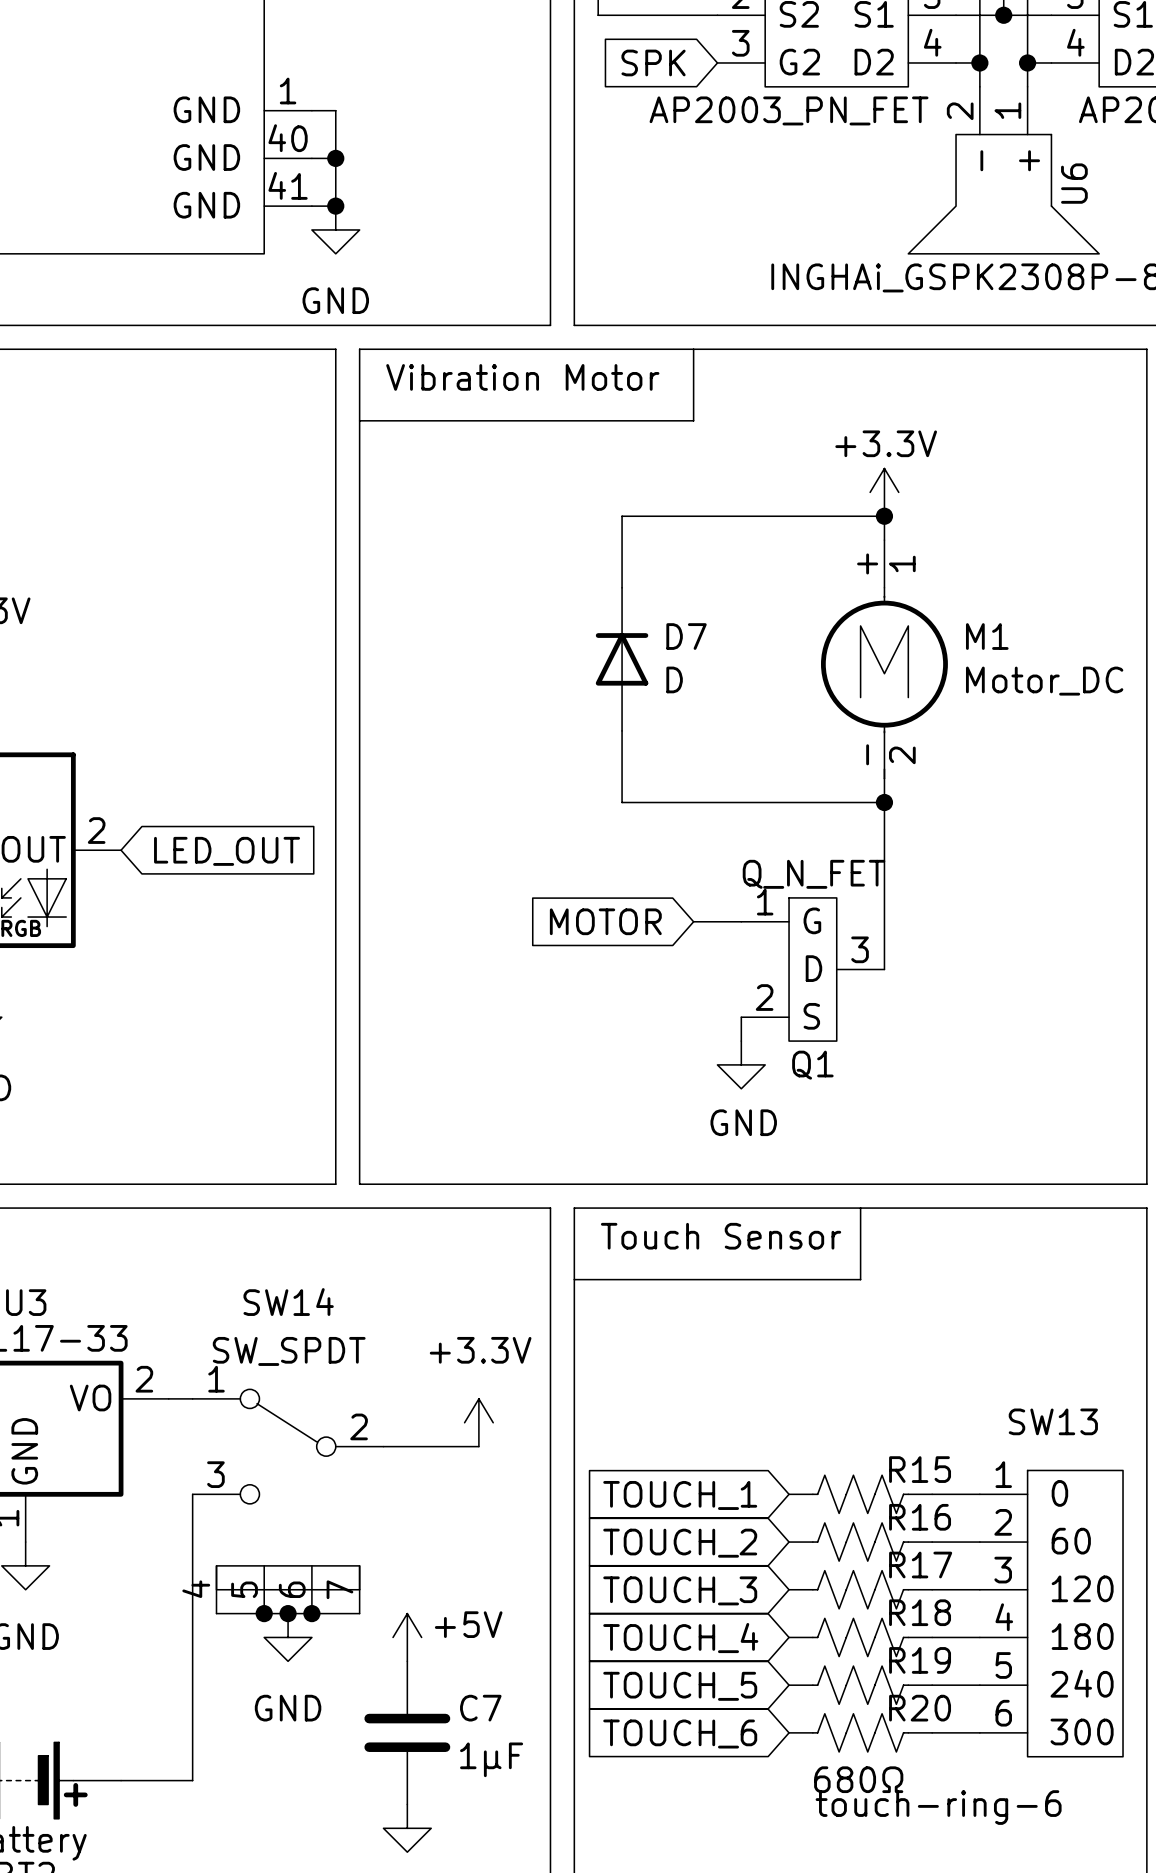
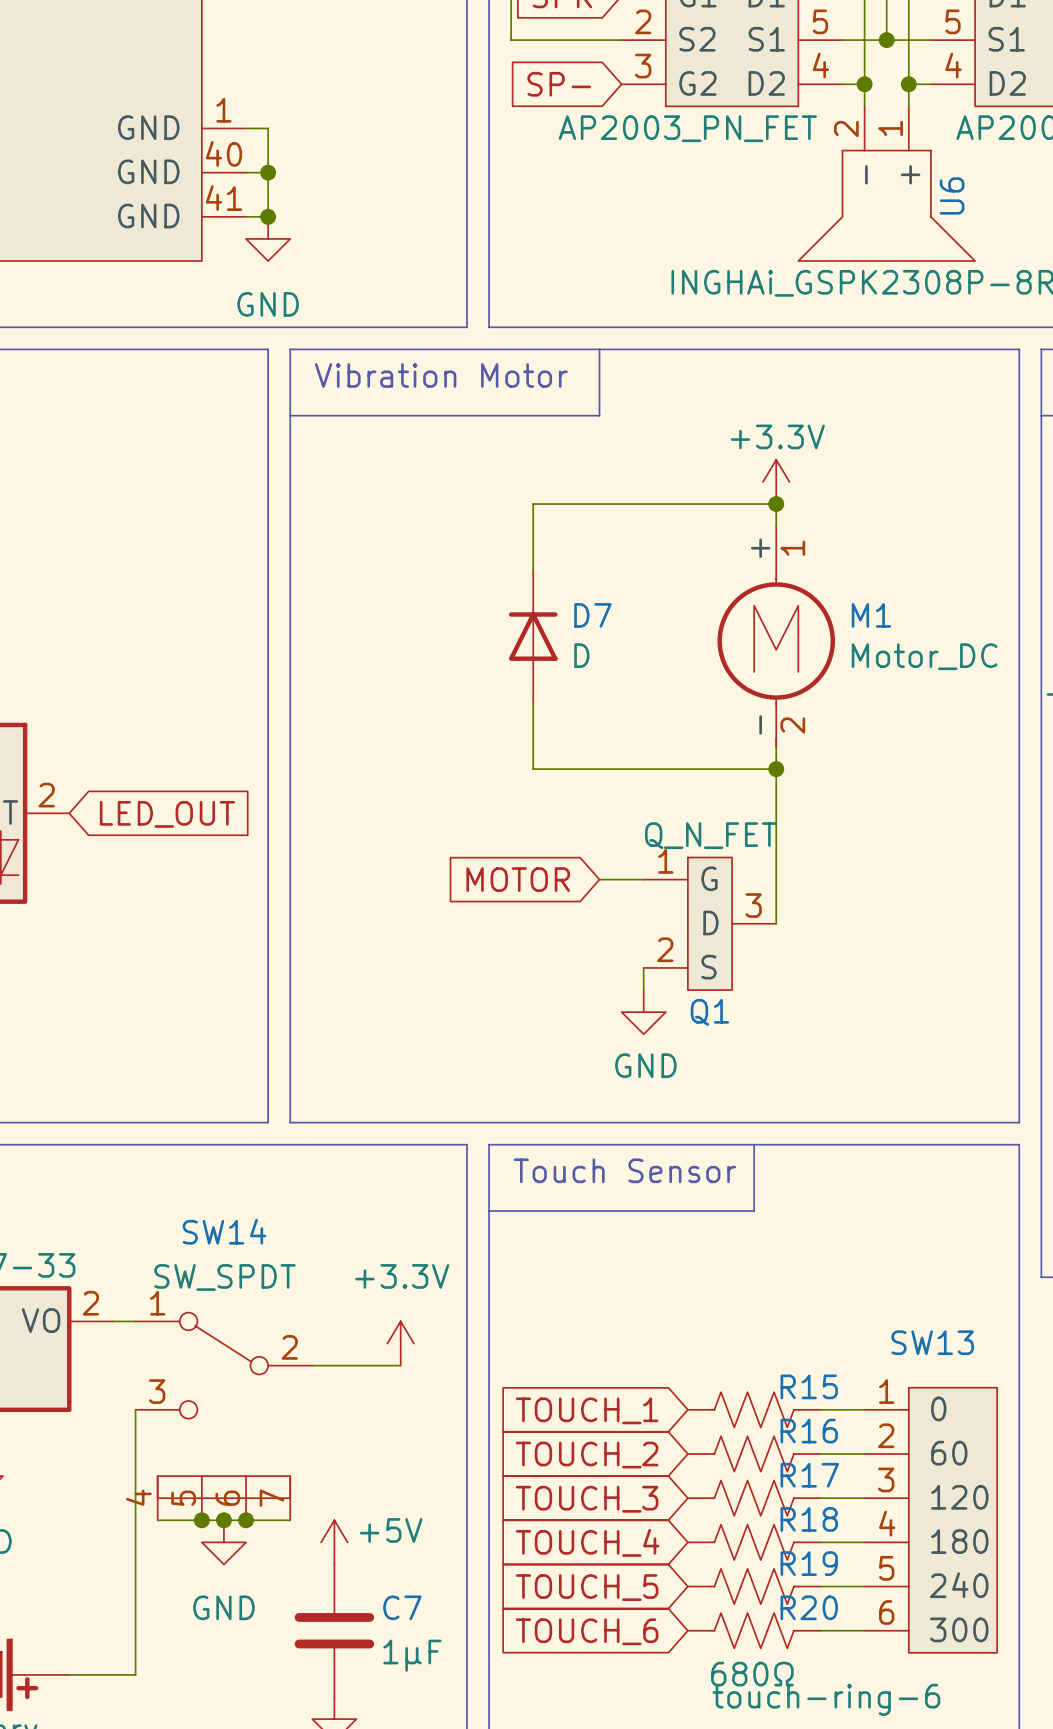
global label: SPK (653, 62) -> SP- (559, 84)

